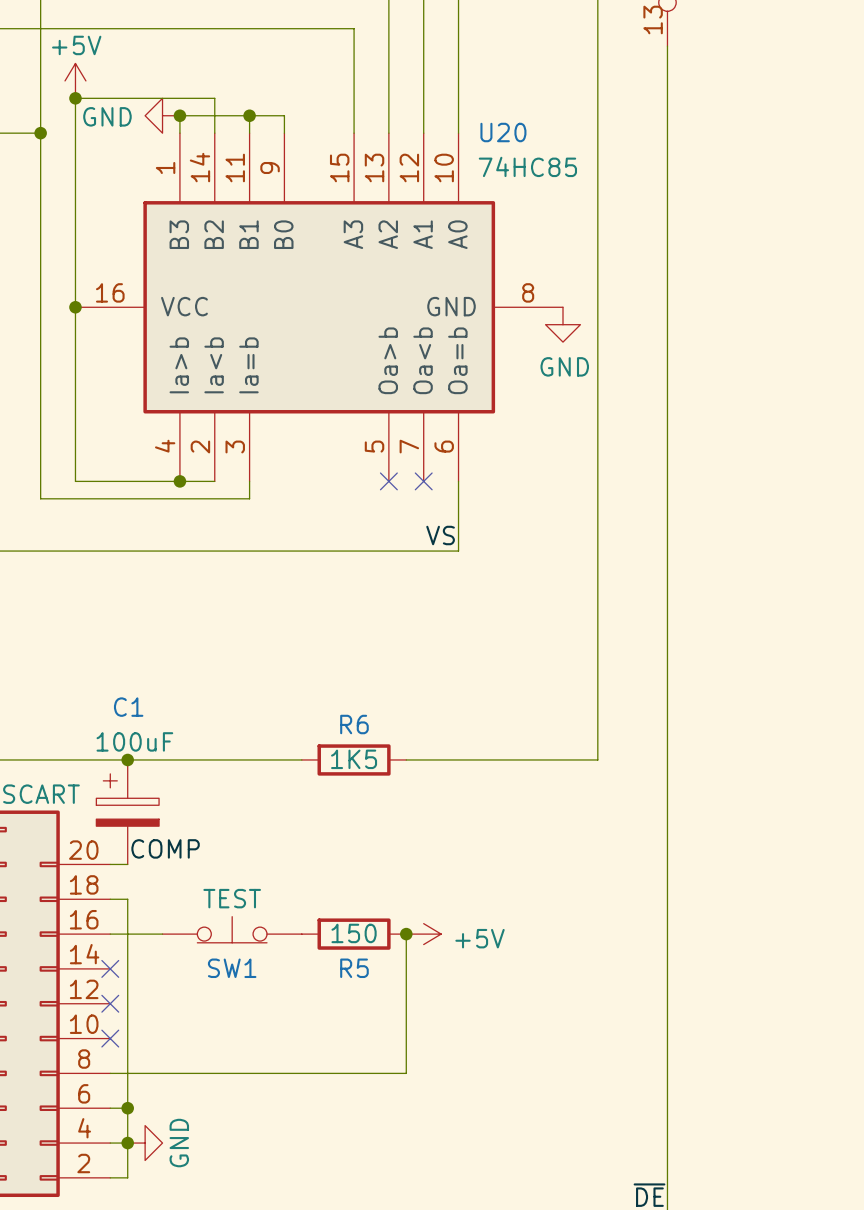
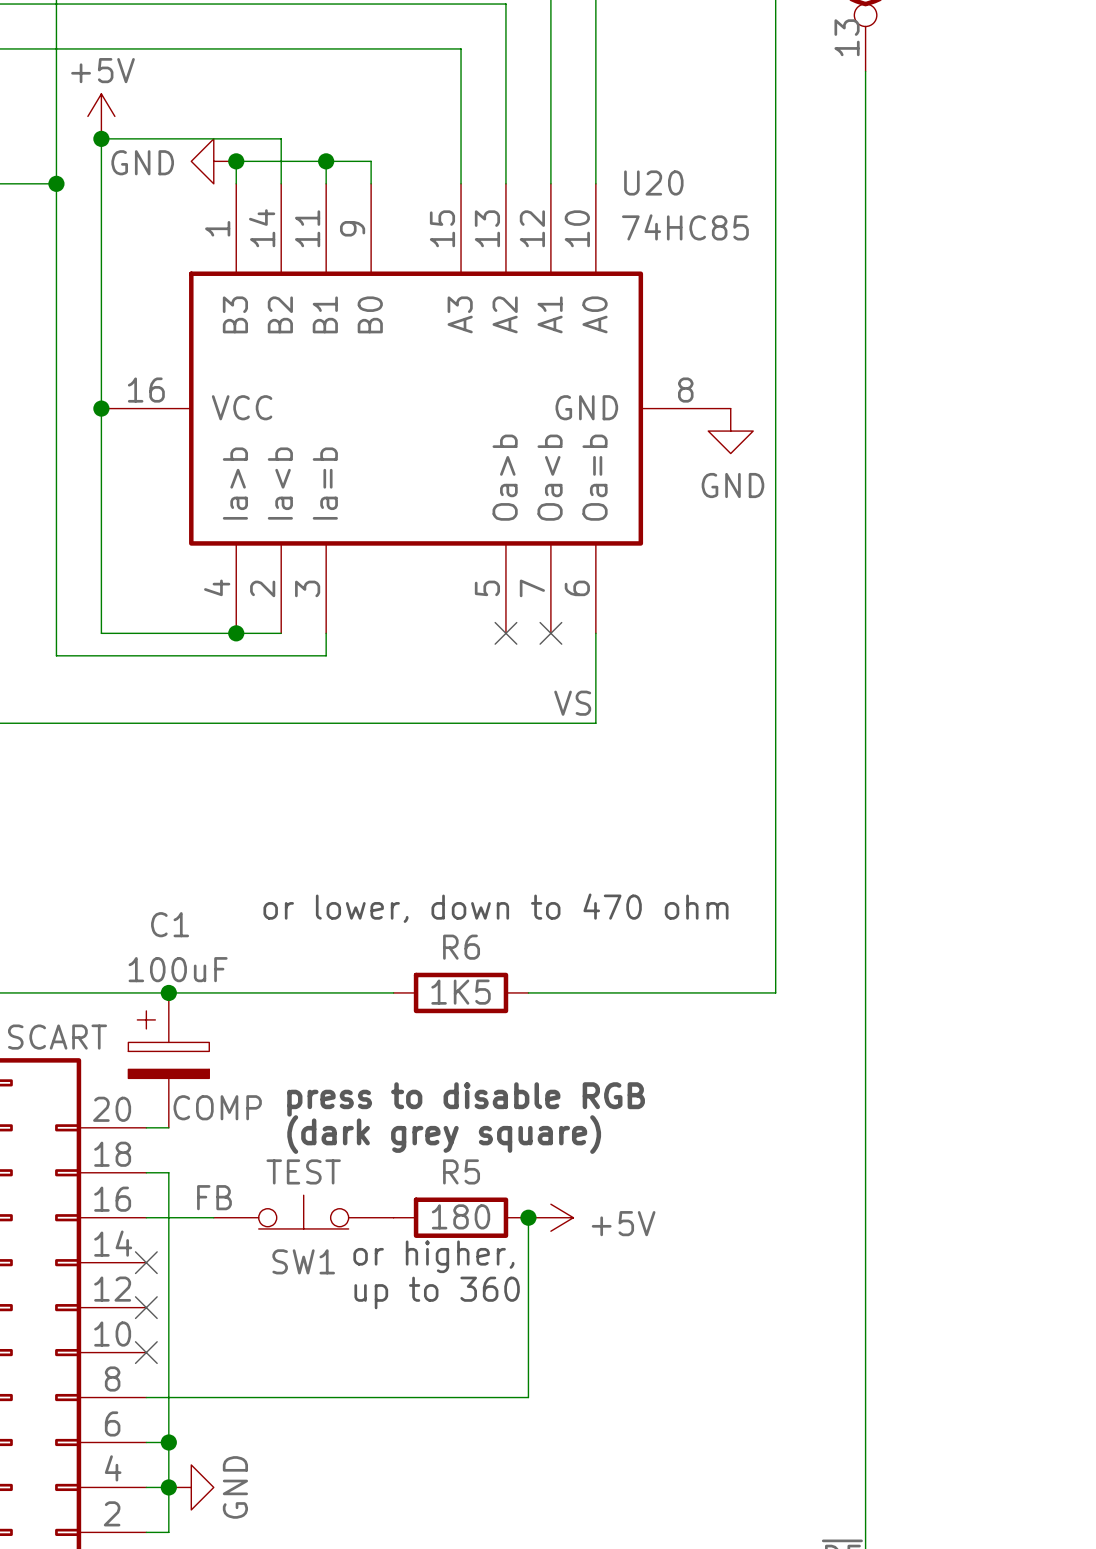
text: none -> or lower, down to 470 ohm (495, 908)
text: none -> press to disable RGB (466, 1099)
text: none -> (dark grey square) (444, 1134)
label: none -> FB (214, 1197)
R5 value: 150 (354, 933) -> 180 (461, 1216)
text: none -> or higher, (433, 1256)
R5 name position: R5 (354, 968) -> R5 (461, 1171)
text: none -> up to 360 (437, 1292)

